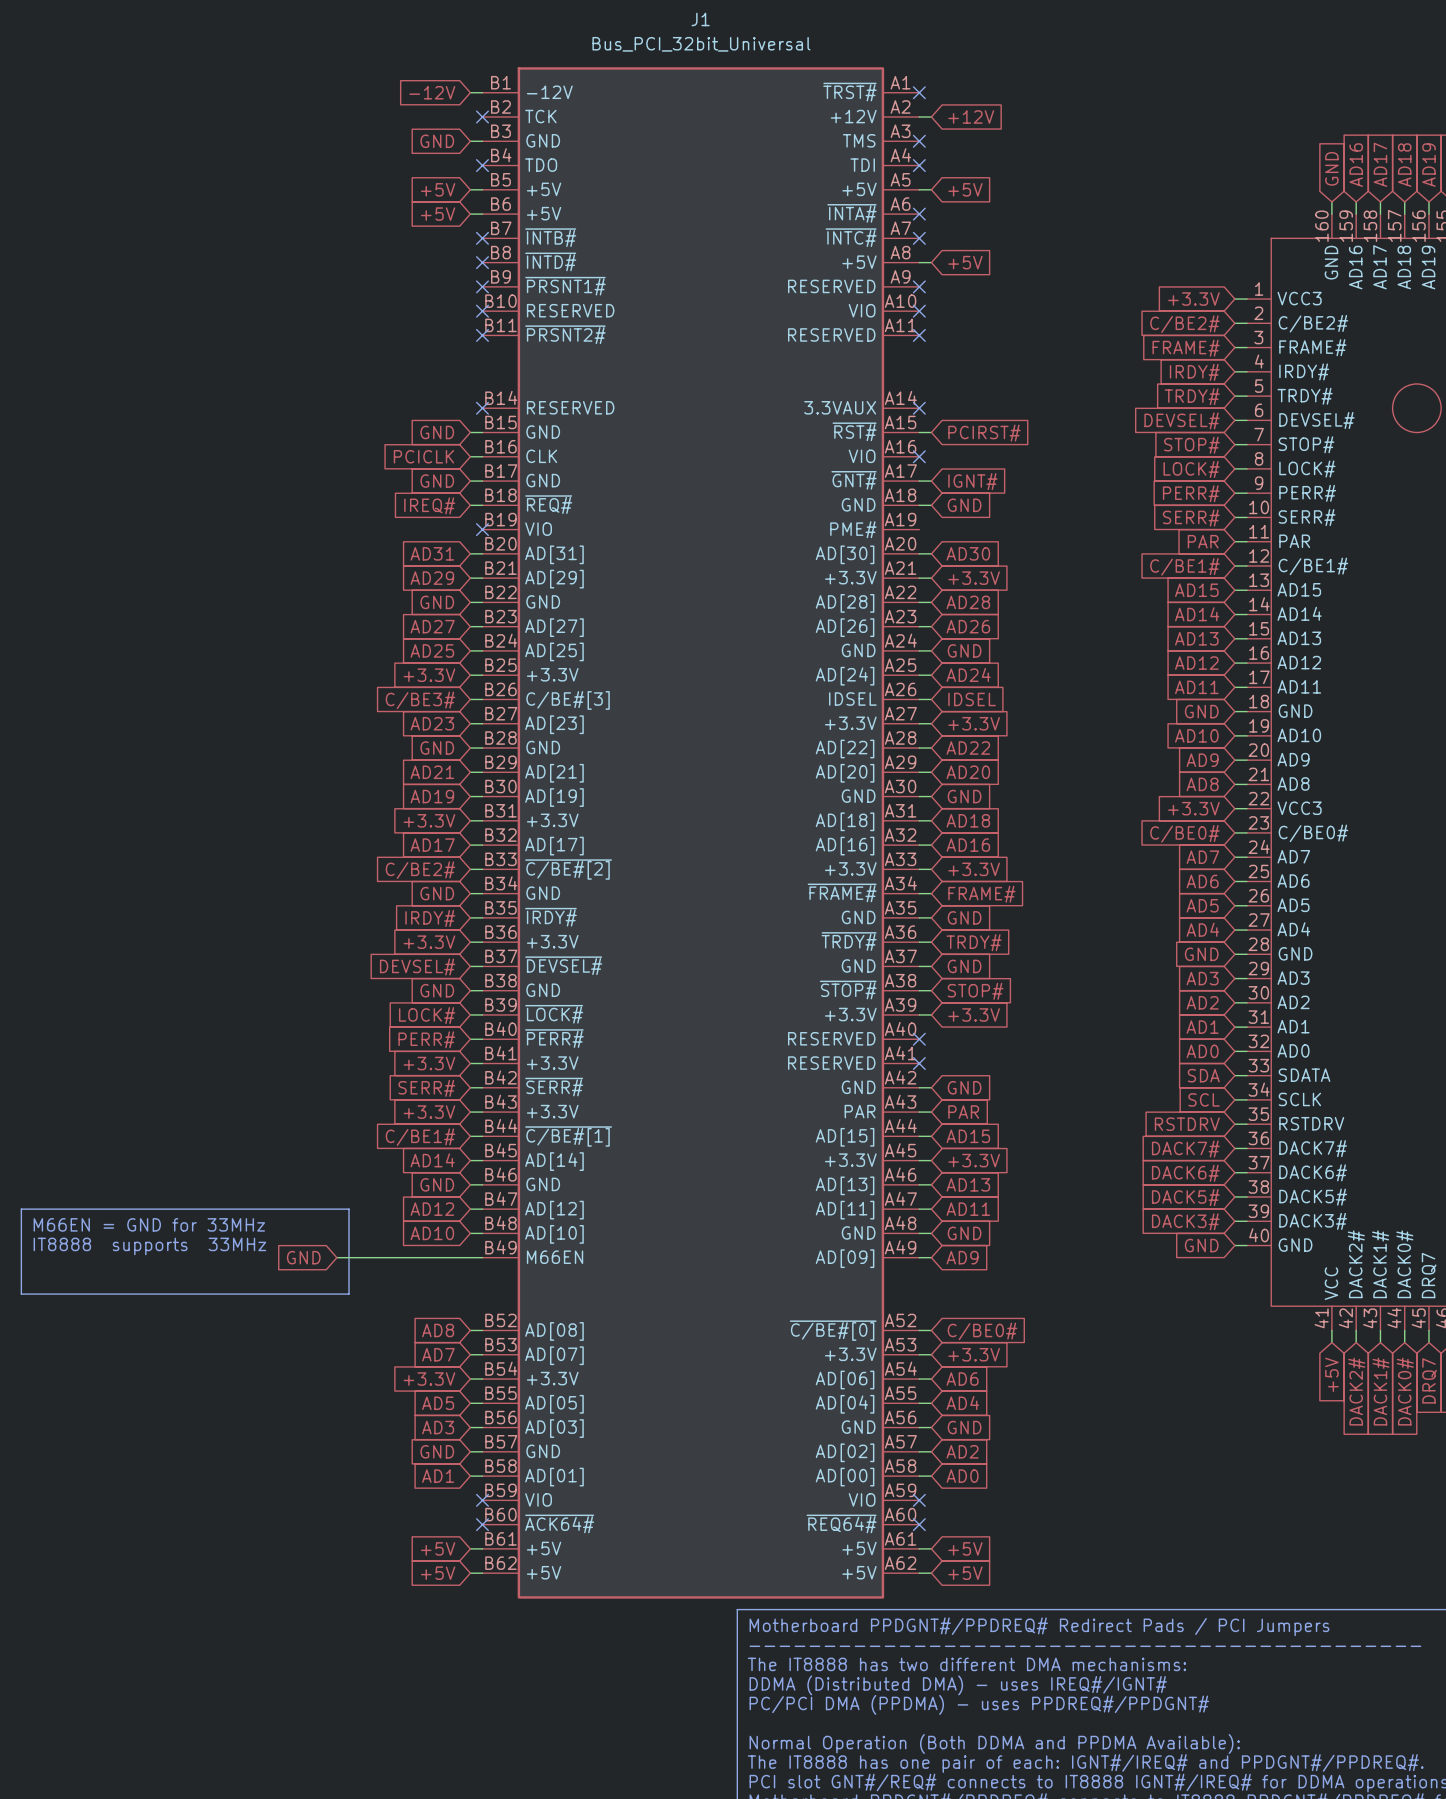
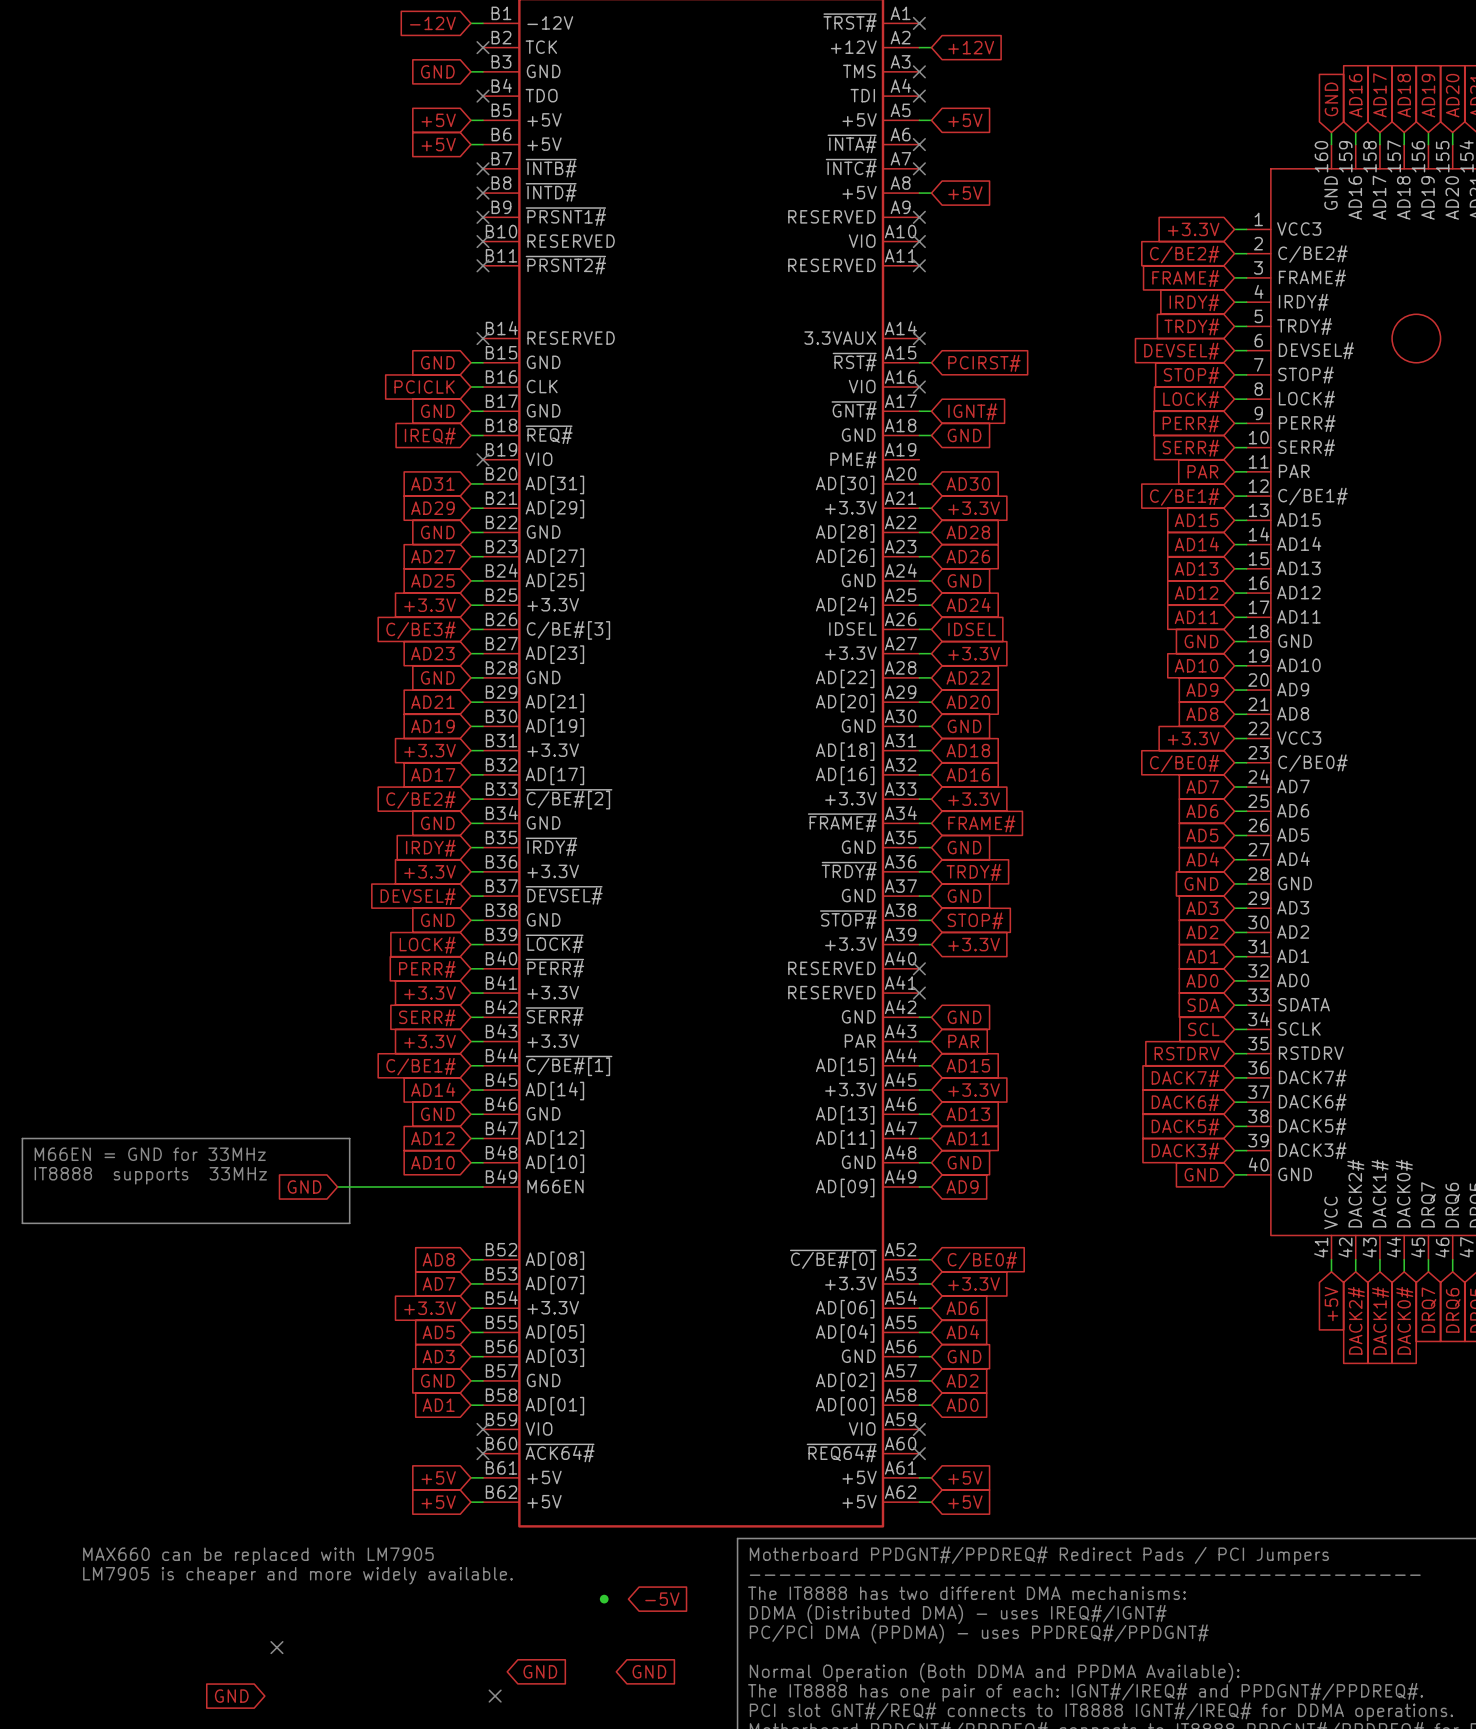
text: none -> MAX660 can be replaced with LM7905 (258, 1556)
text: none -> LM7905 is cheaper and more widely available. (297, 1575)
junction: none -> (604, 1599)
global label: none -> -5V (662, 1599)
no-connect mark: none -> (276, 1647)
global label: none -> GND (540, 1671)
global label: none -> GND (649, 1671)
global label: none -> GND (231, 1696)
no-connect mark: none -> (495, 1696)

